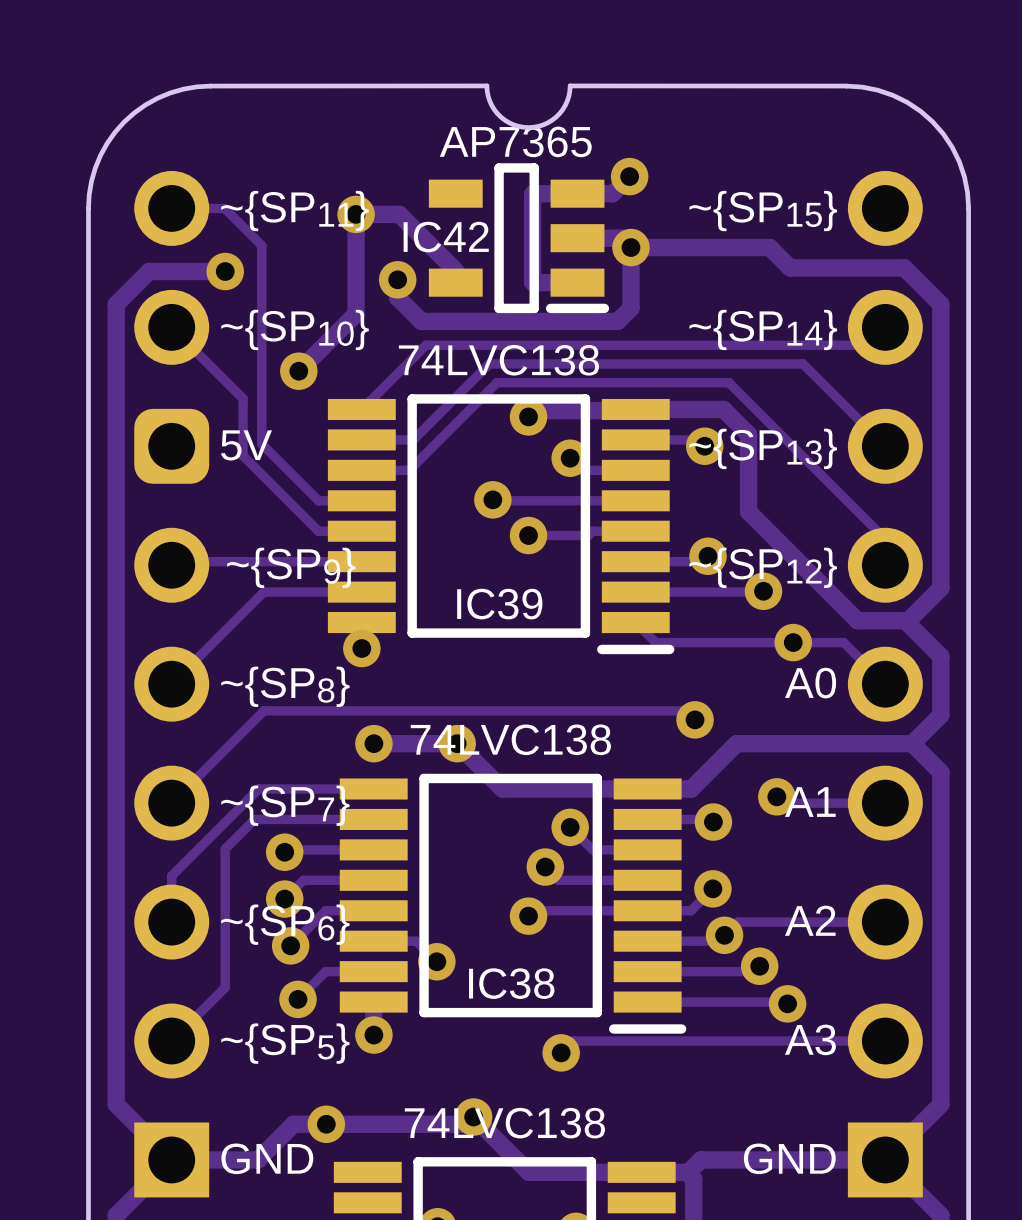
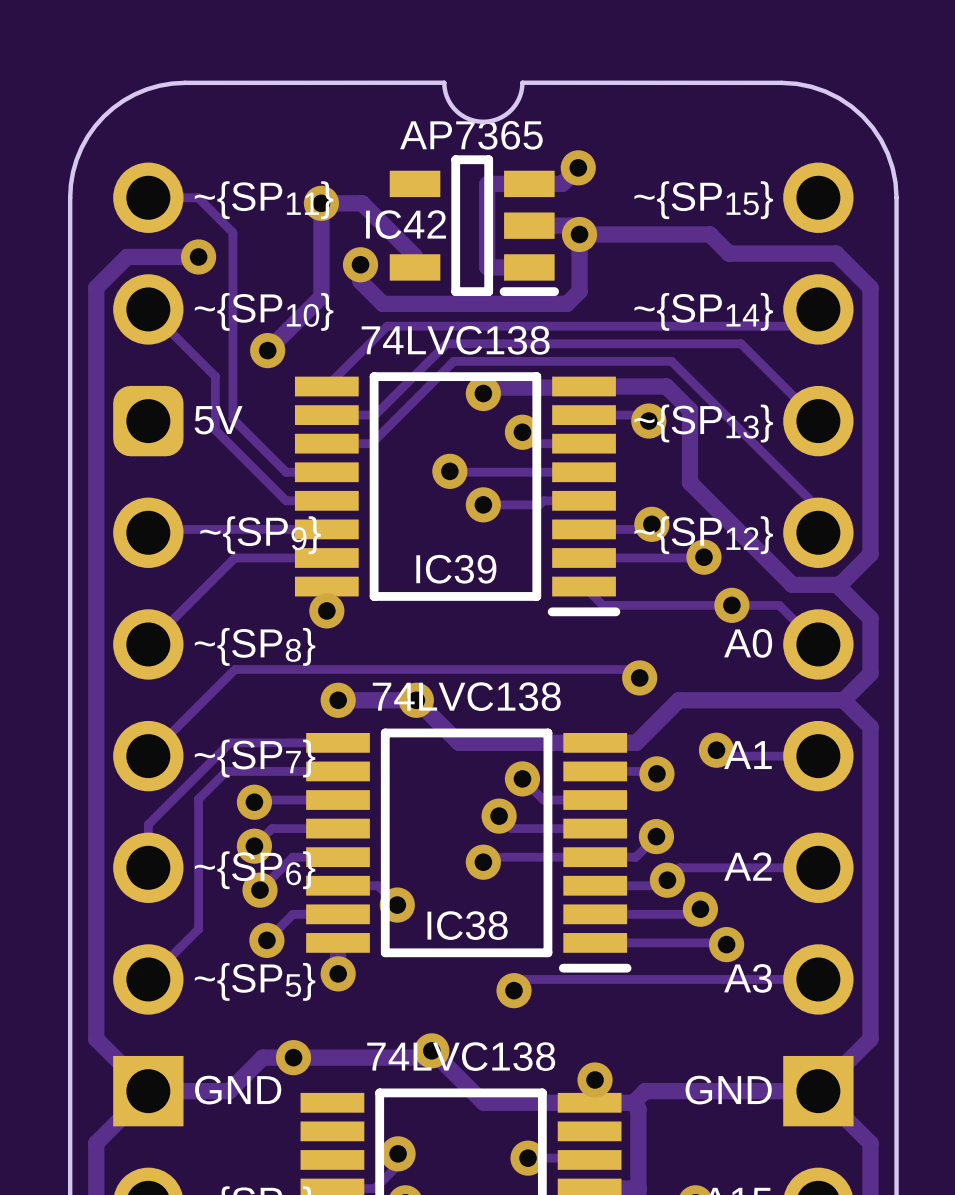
via: none -> (595, 1079)

